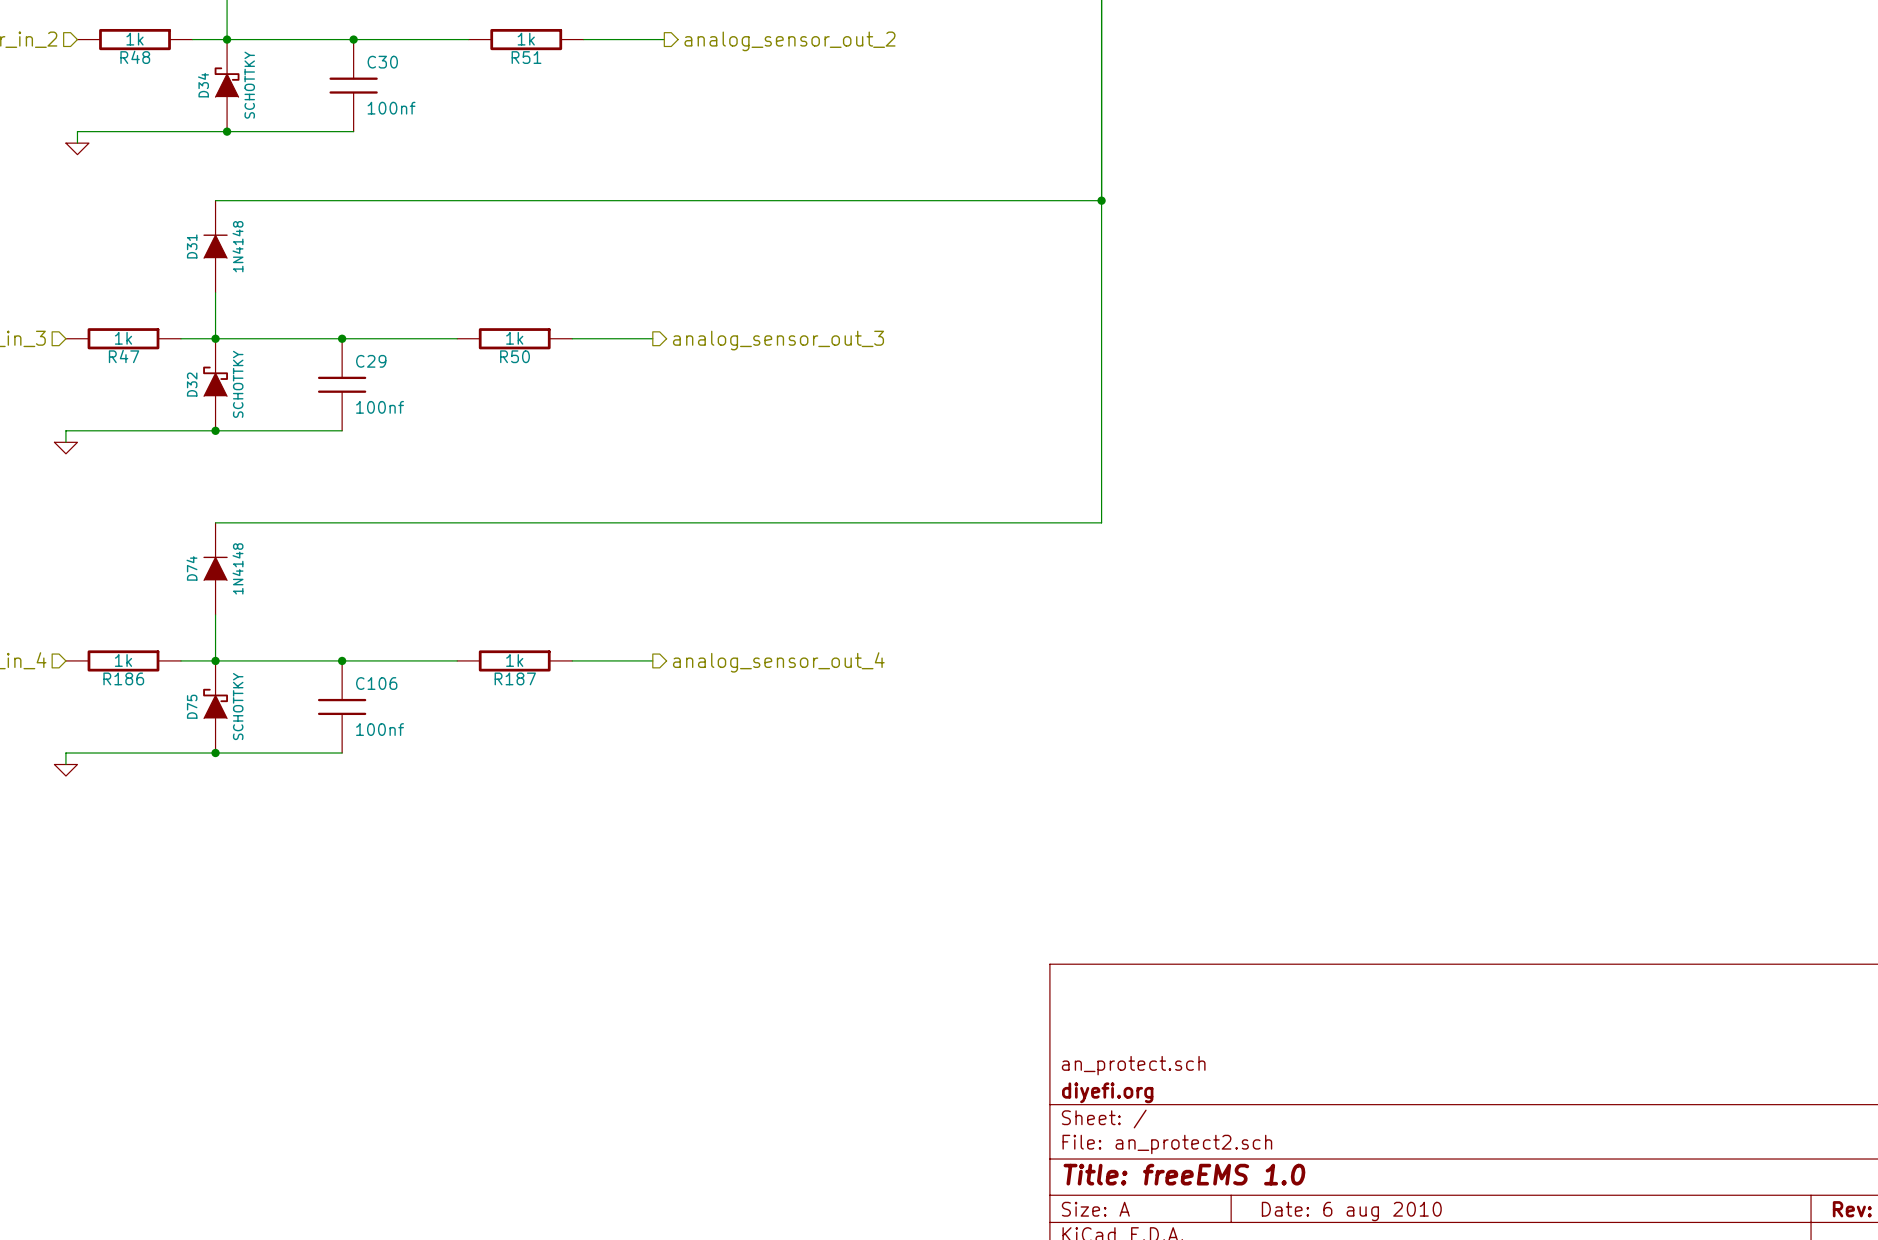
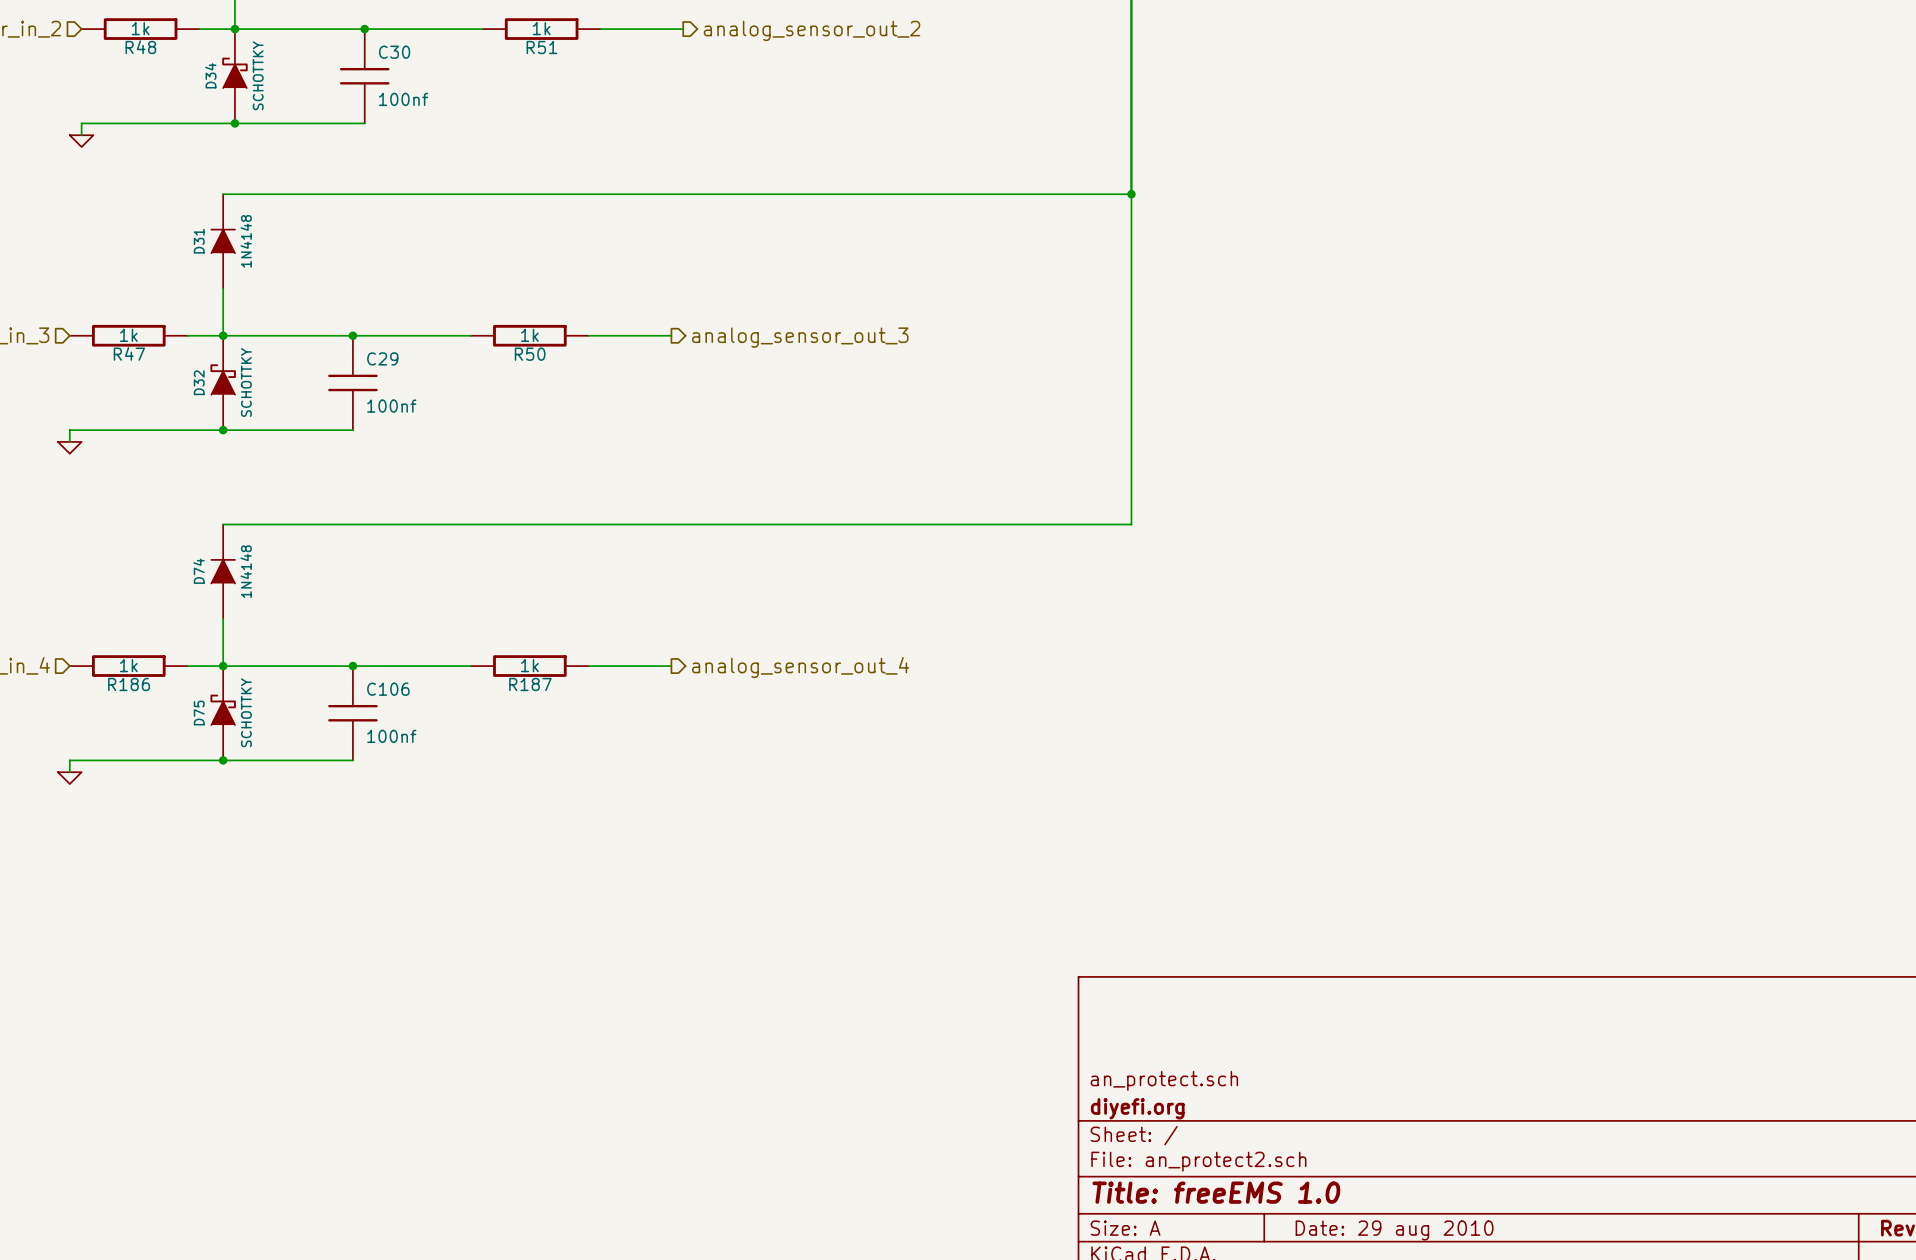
title block: Date: 6 aug 2010 (1351, 1211) -> Date: 29 aug 2010 (1394, 1230)

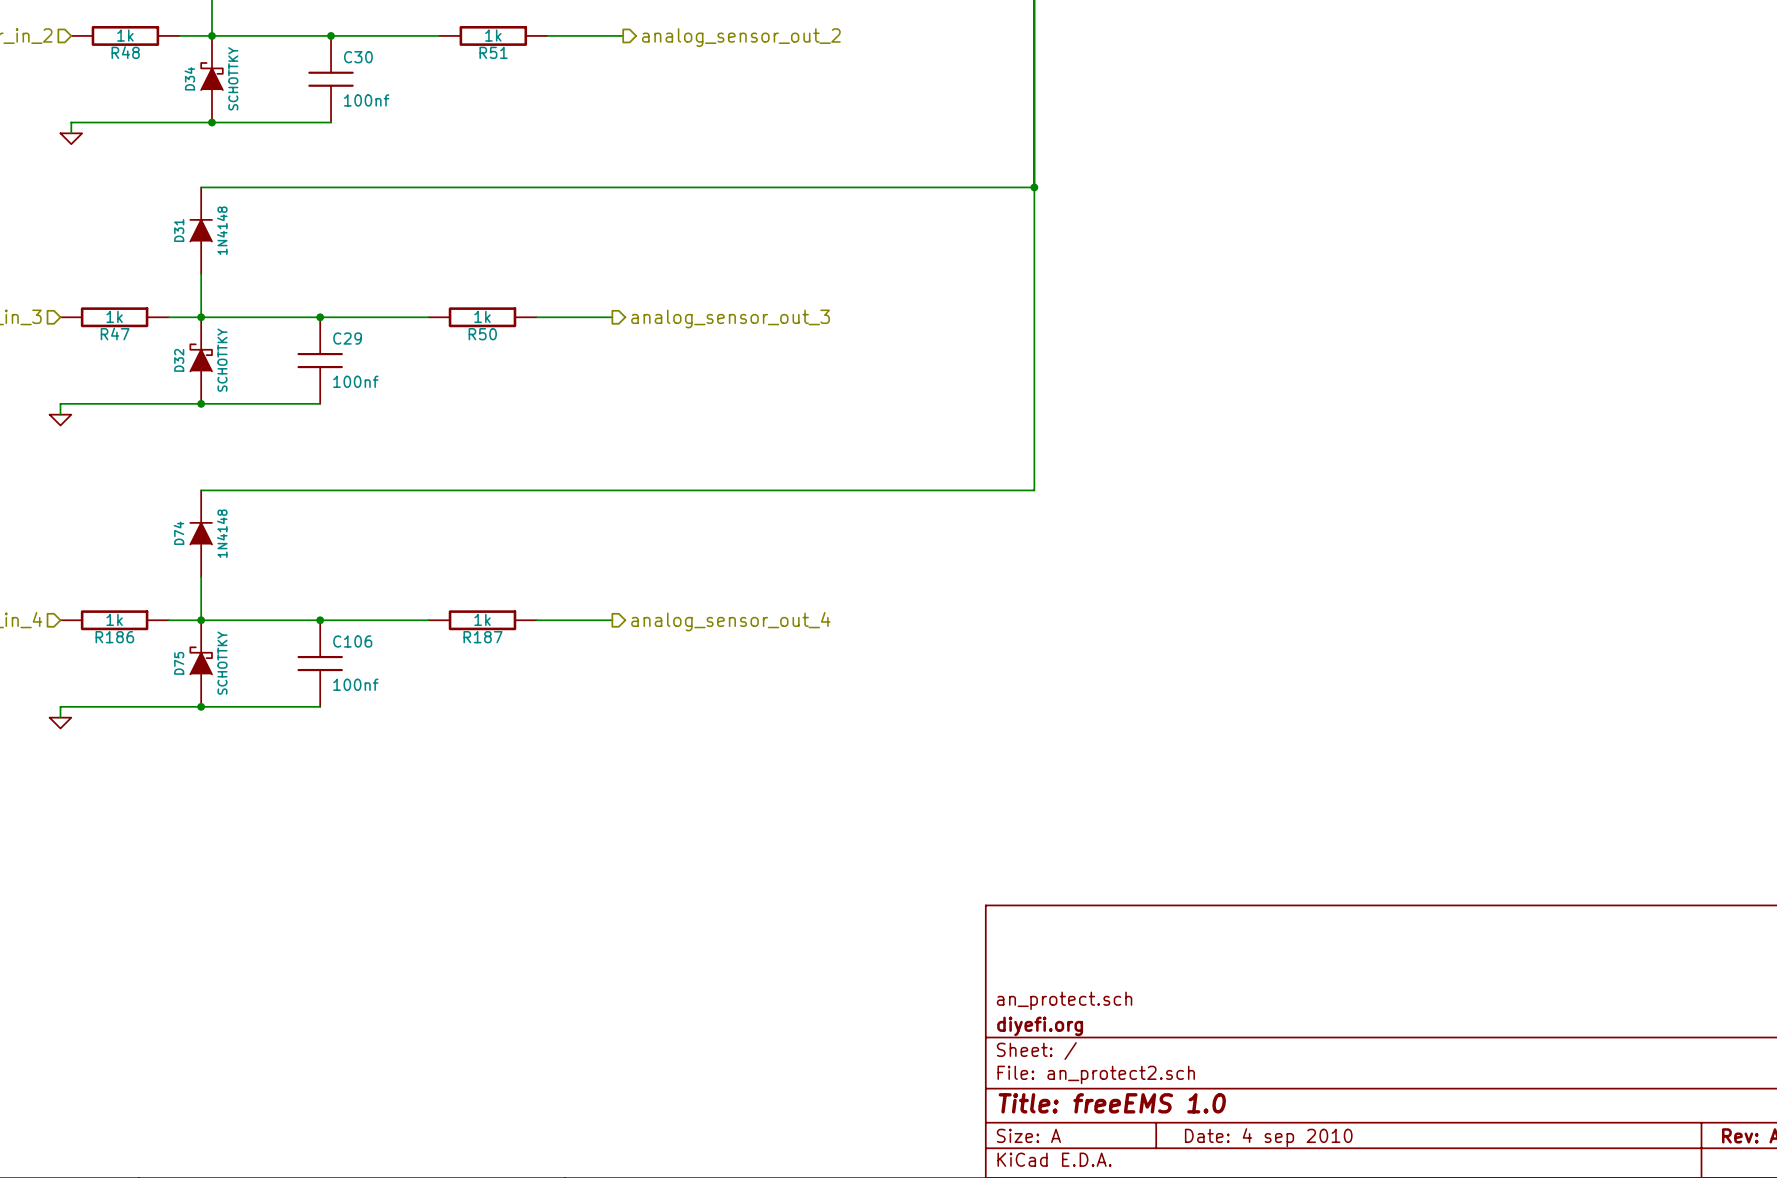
title block: Date: 29 aug 2010 (1394, 1230) -> Date: 4 sep 2010 (1268, 1137)

